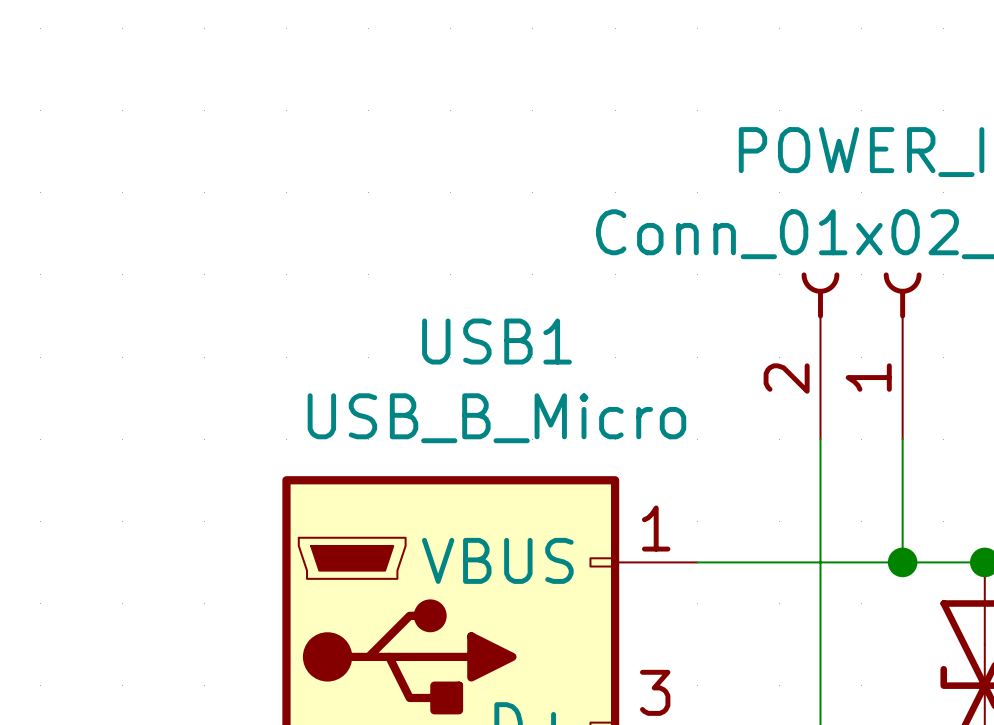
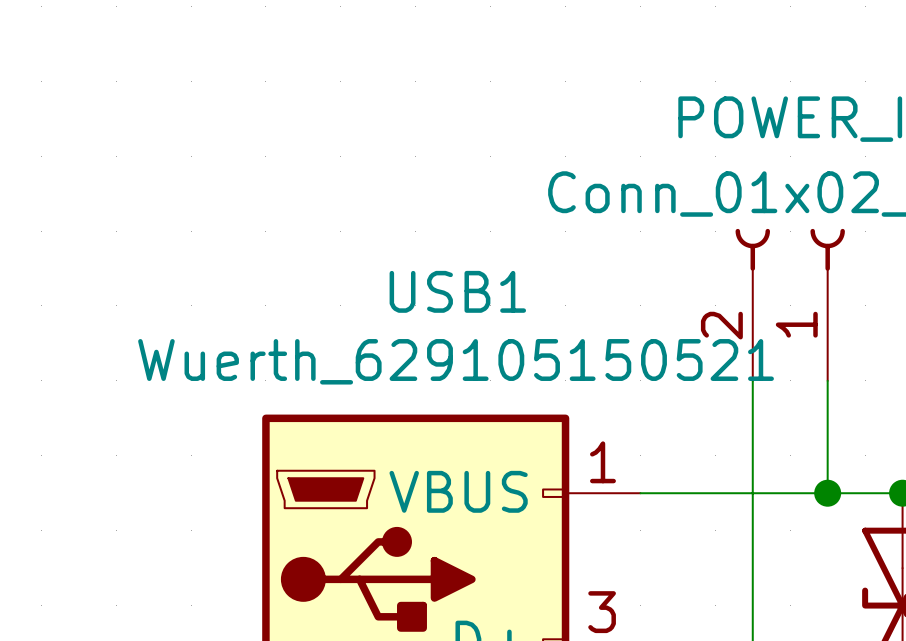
USB1 value: USB_B_Micro (496, 418) -> Wuerth_629105150521 (456, 361)

